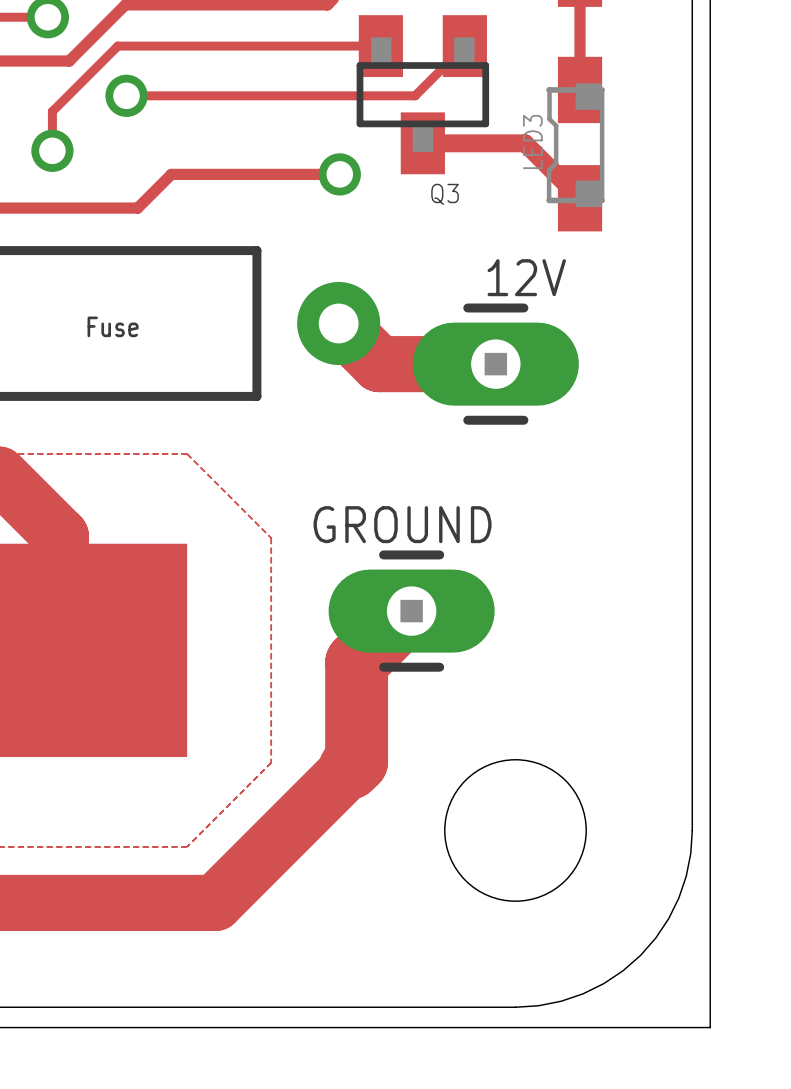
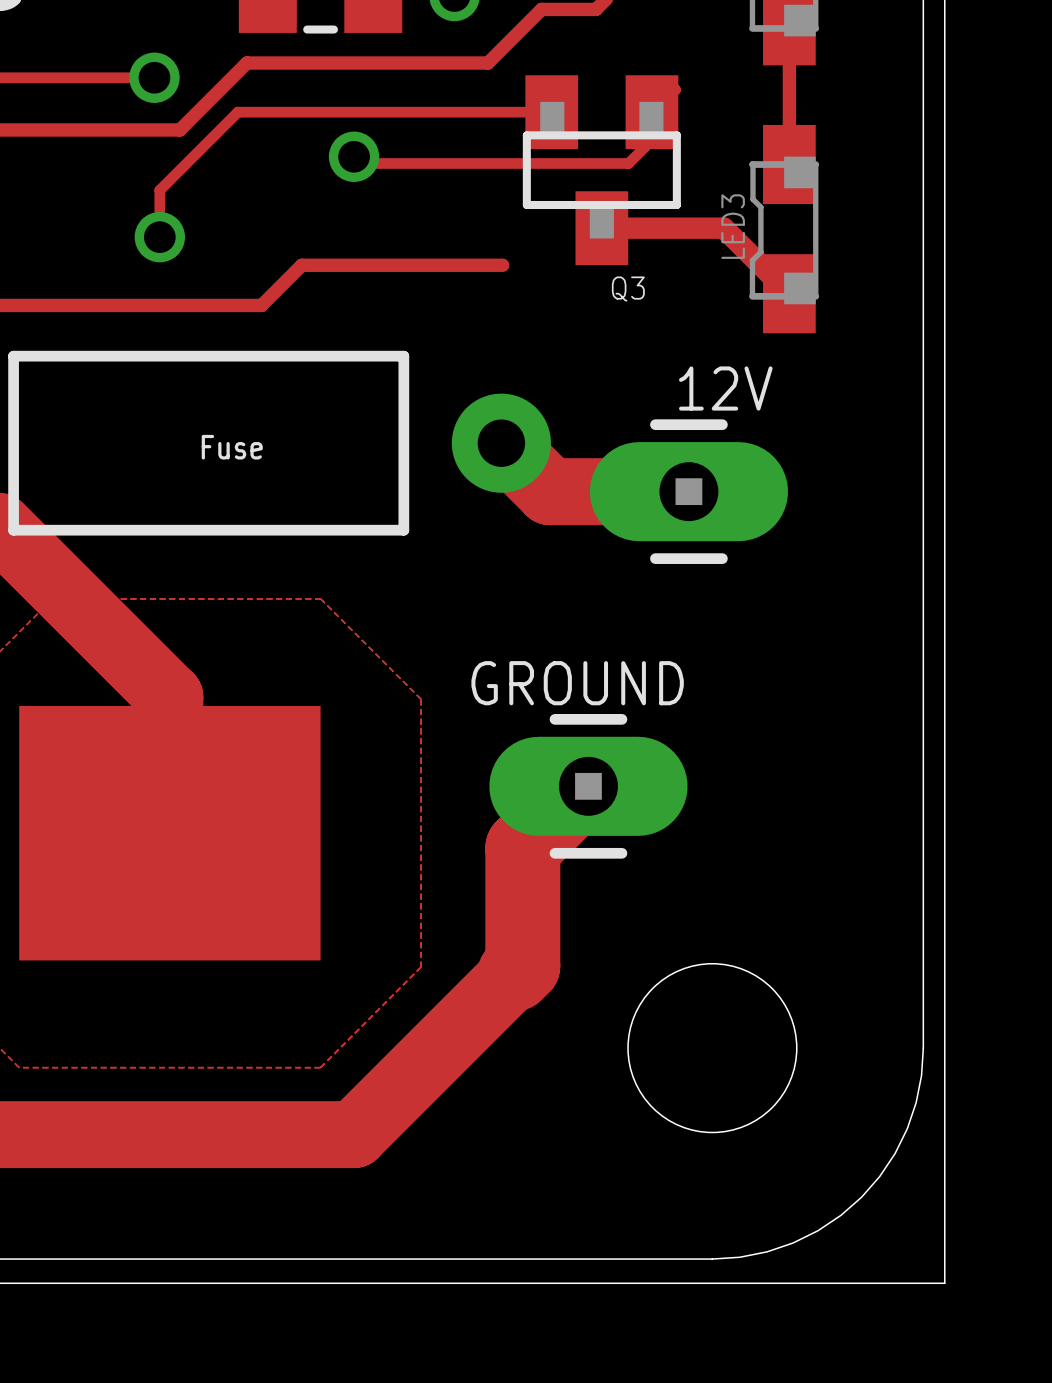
track: (464, 46) (415, 95) (126, 95) -> (651, 112) (675, 89) (648, 116) (648, 143) (628, 163) (354, 163) (354, 156)
via: none -> (354, 156)
via: (126, 95) -> none
via: (339, 174) -> none

